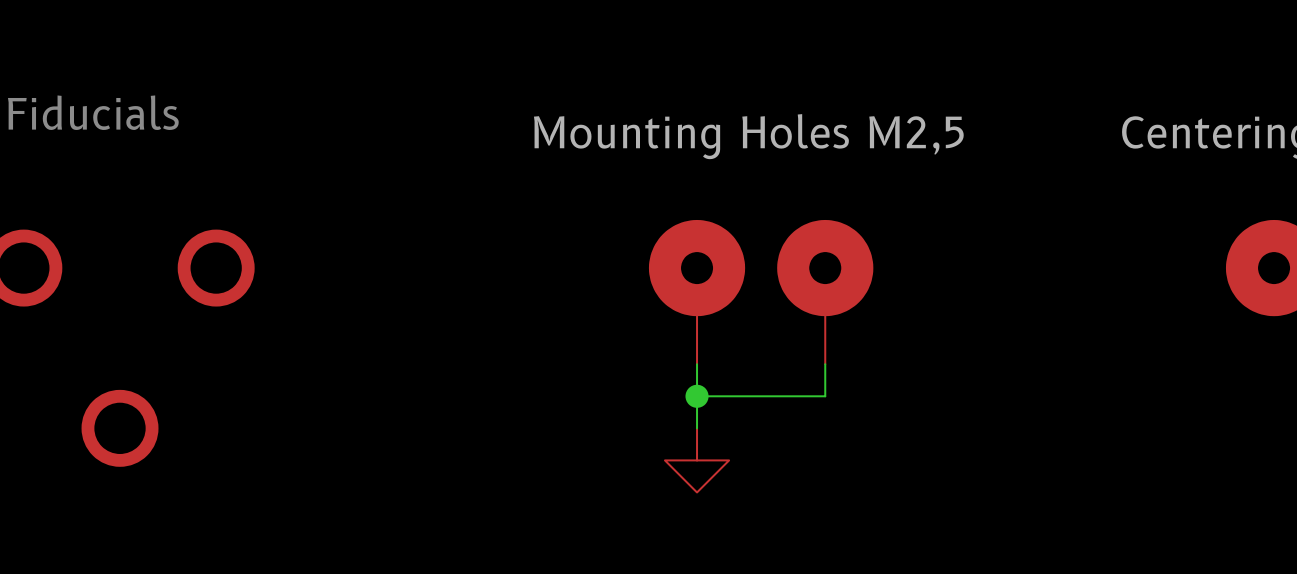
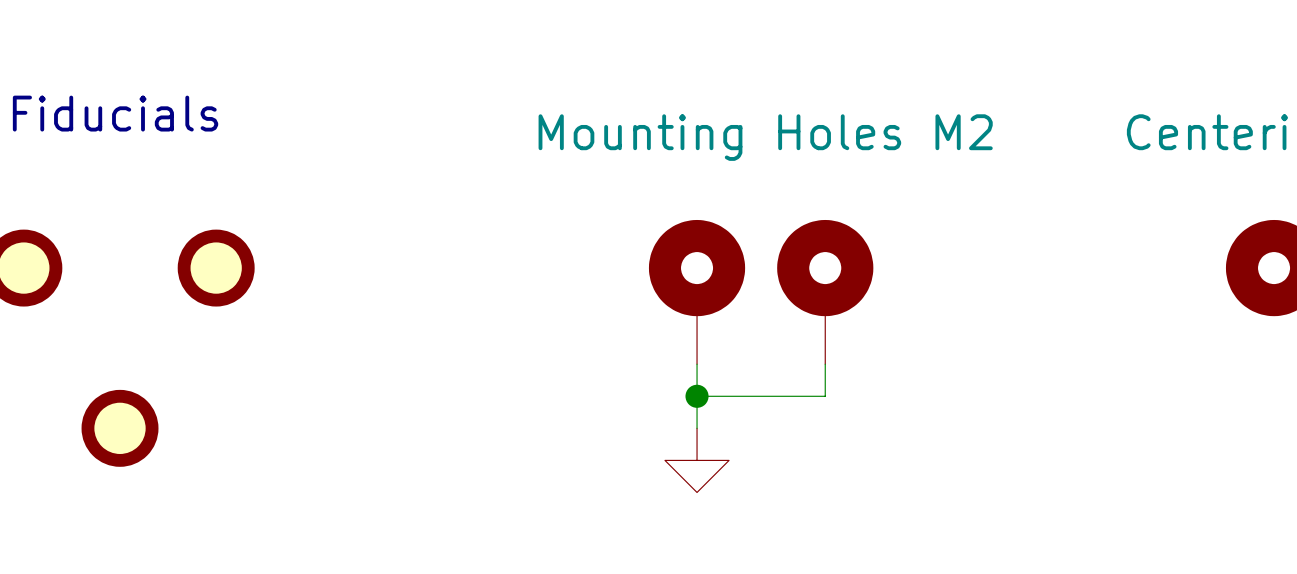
part value: Mounting Holes M2,5 (748, 136) -> Mounting Holes M2 (765, 137)

